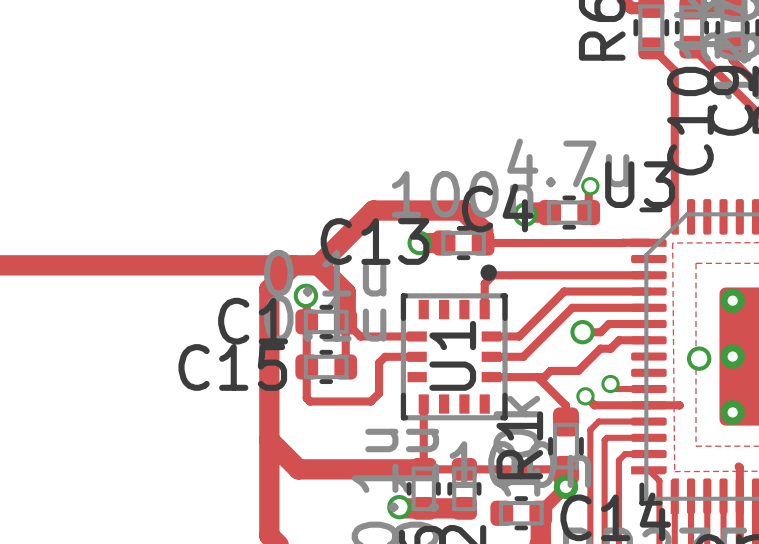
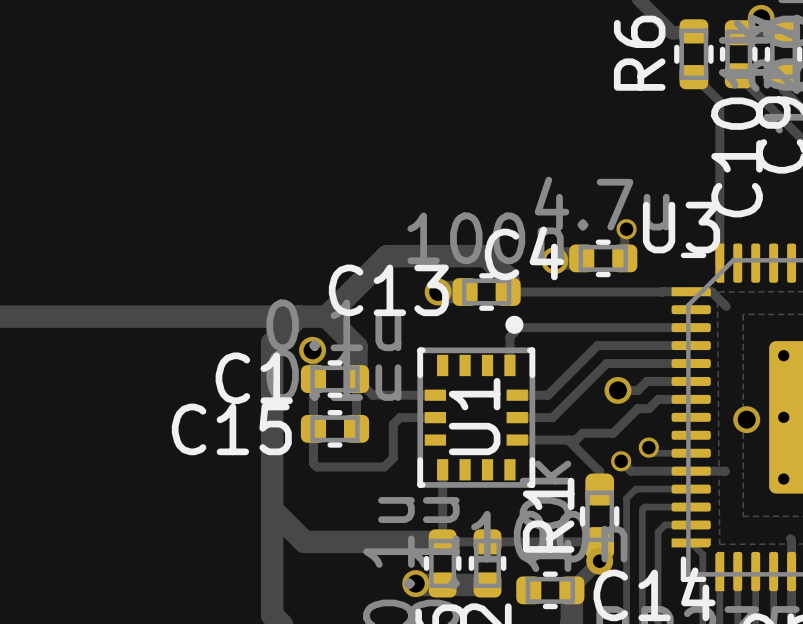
track: none -> (691, 291) (711, 291) (726, 306)

